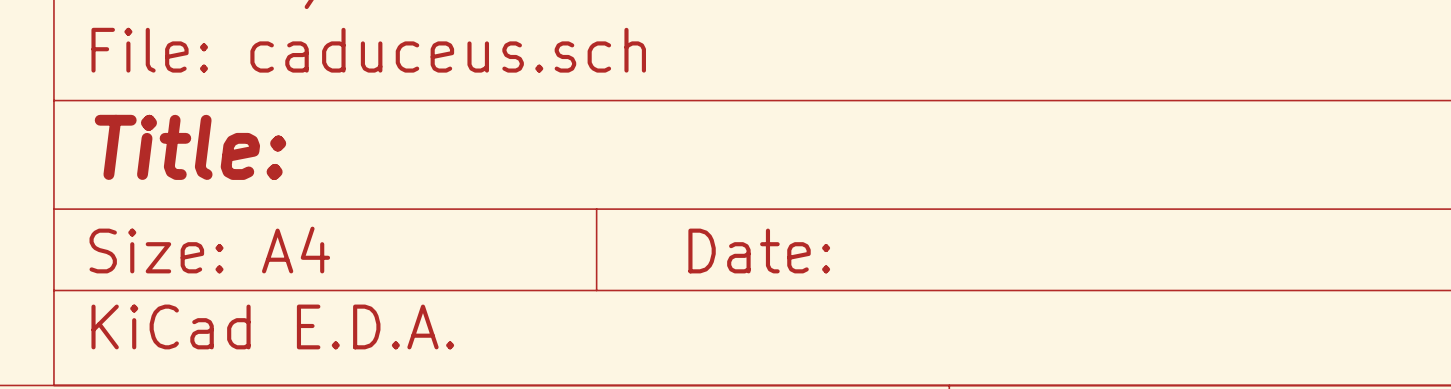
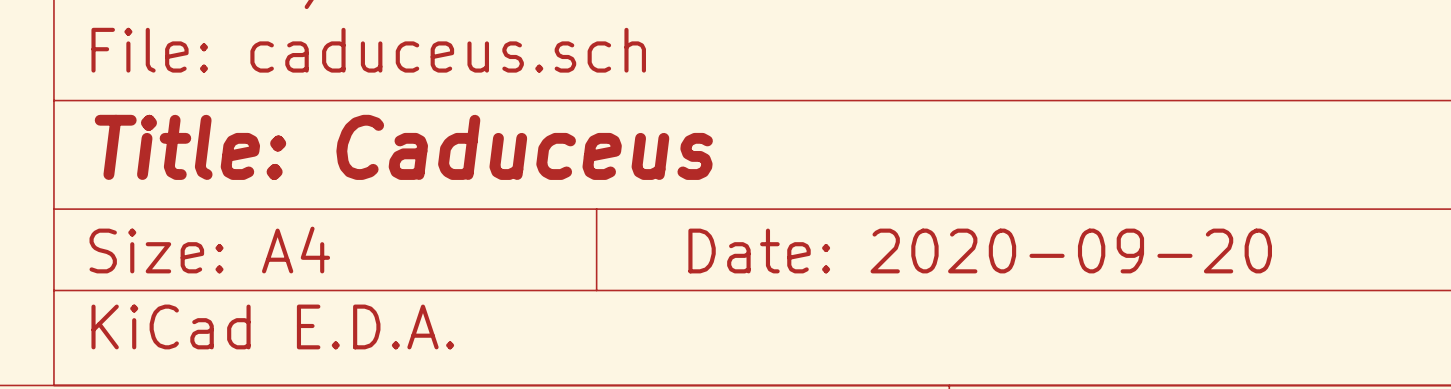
title block: Title: (190, 147) -> Title: Caduceus (403, 147)
title block: Date: (759, 250) -> Date: 2020-09-20 (980, 250)

